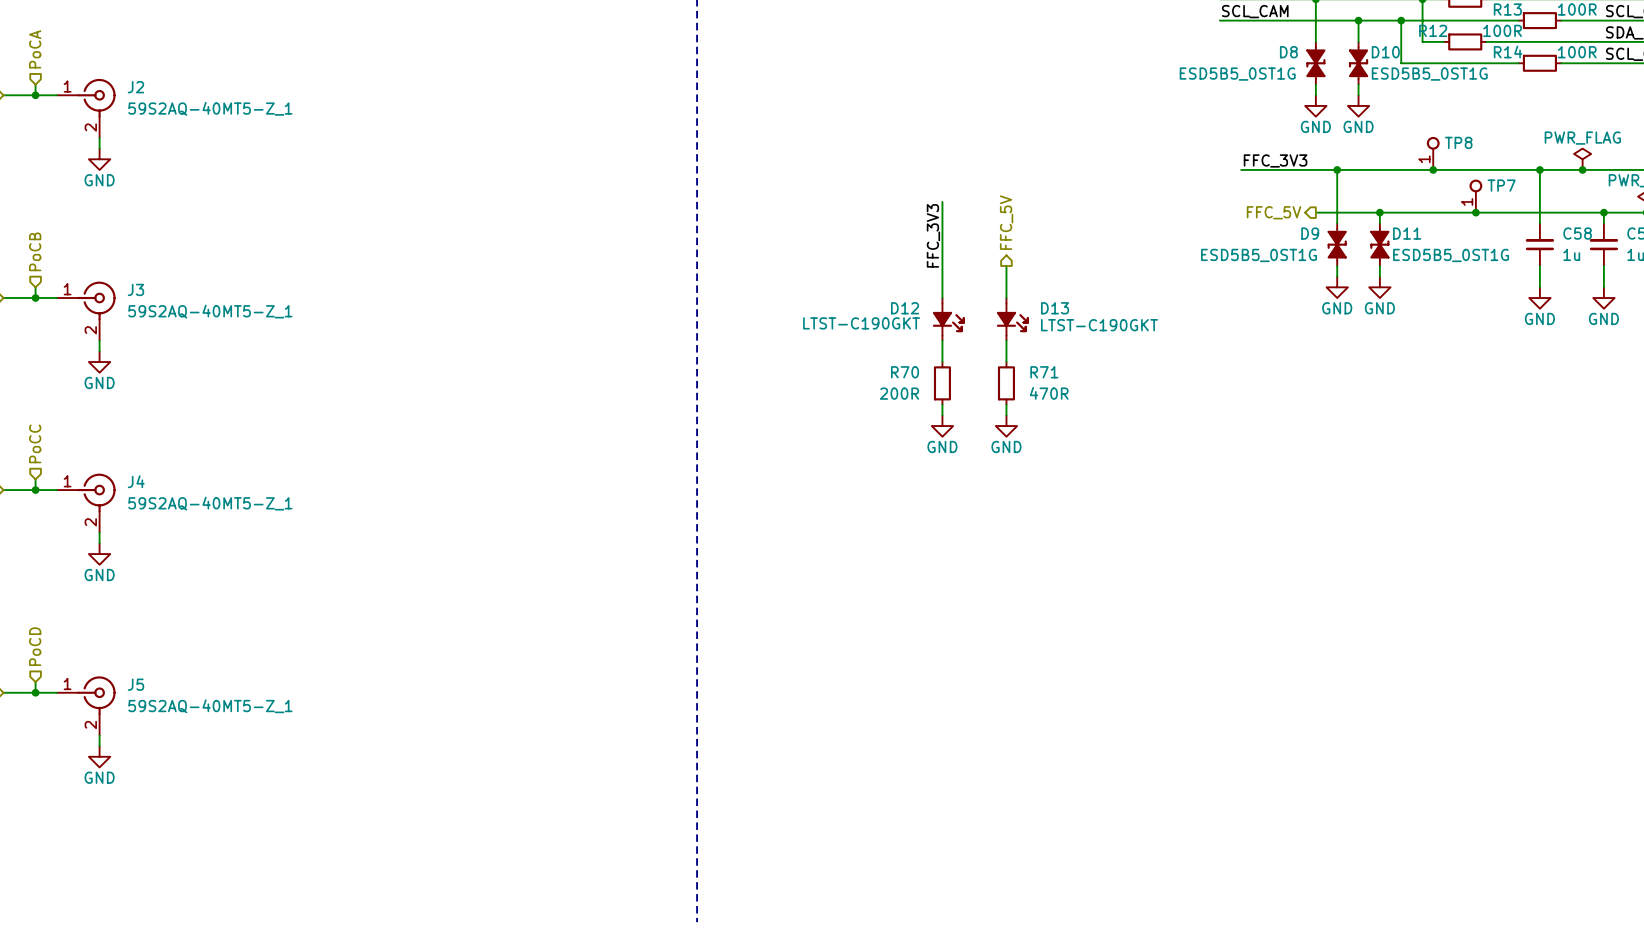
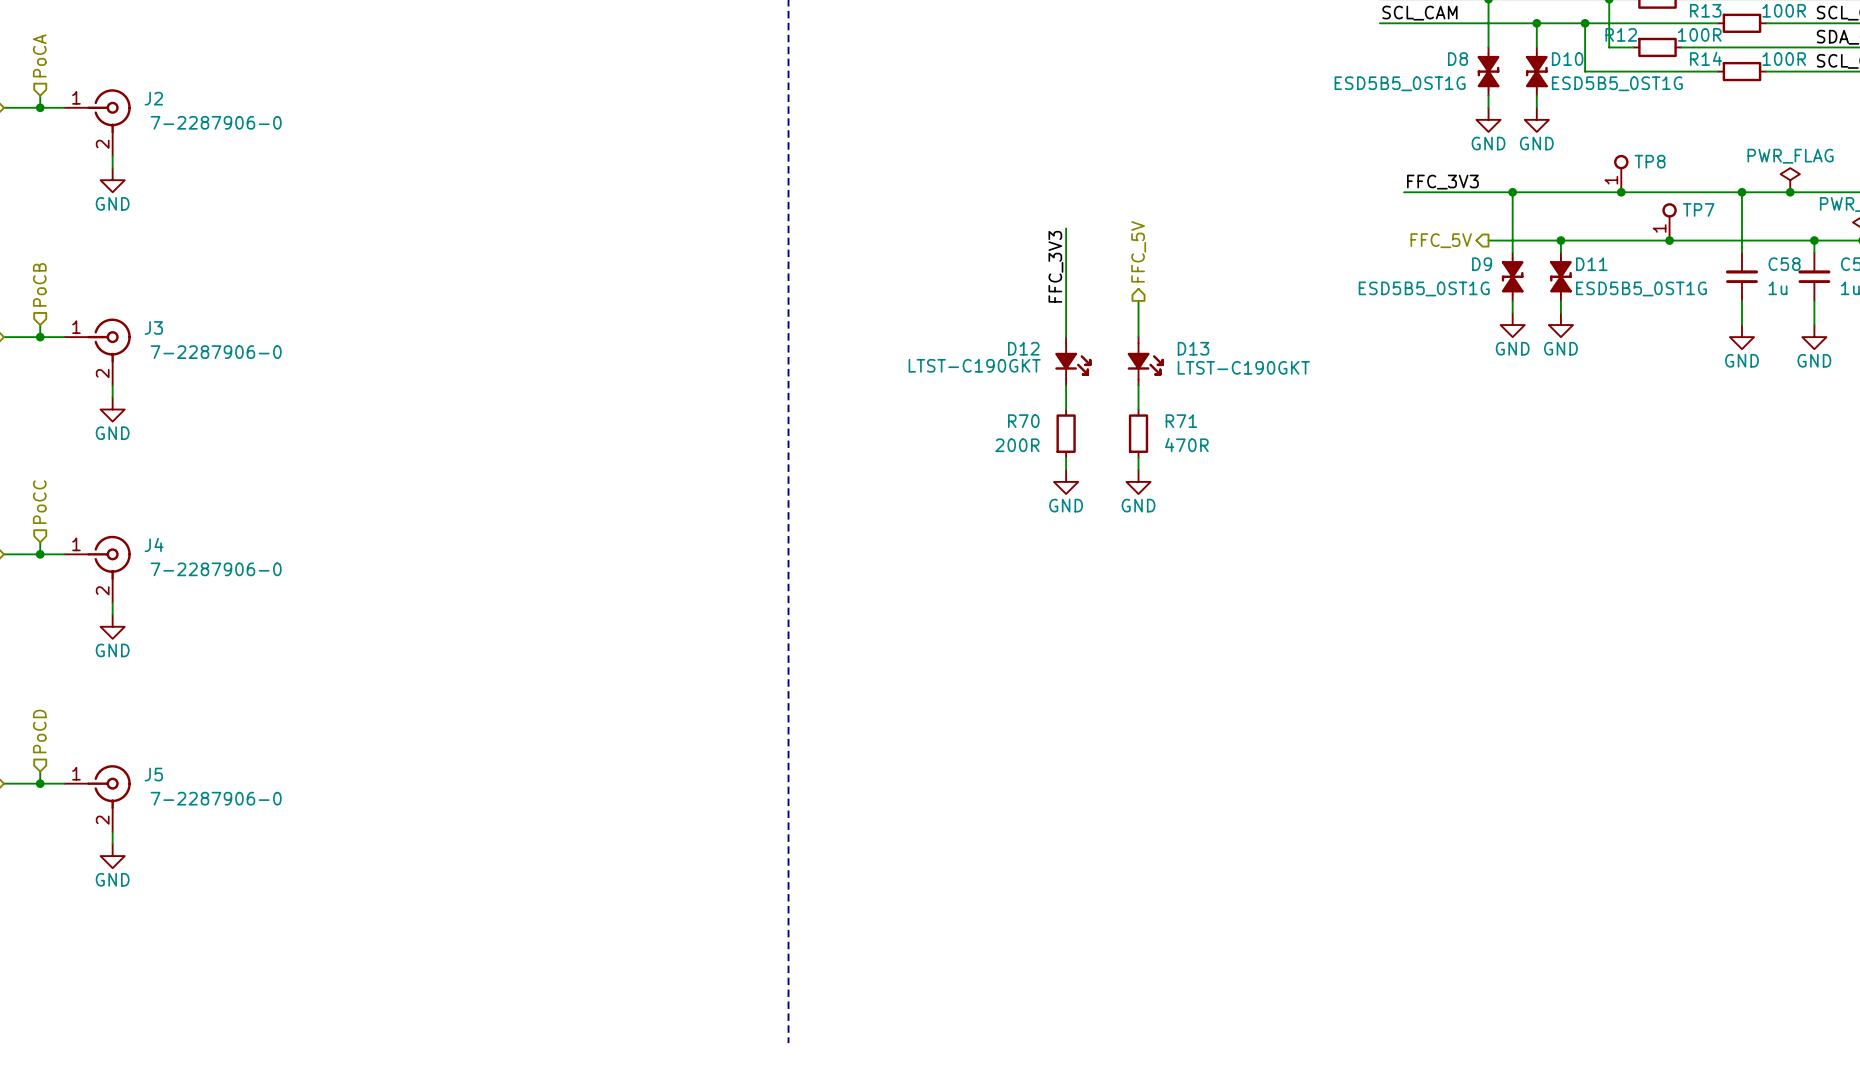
J2 text: 59S2AQ-40MT5-Z_1 (210, 108) -> 7-2287906-0 (216, 122)
J3 text: 59S2AQ-40MT5-Z_1 (210, 311) -> 7-2287906-0 (216, 352)
J4 text: 59S2AQ-40MT5-Z_1 (210, 503) -> 7-2287906-0 (216, 569)
J5 text: 59S2AQ-40MT5-Z_1 (210, 706) -> 7-2287906-0 (216, 798)

